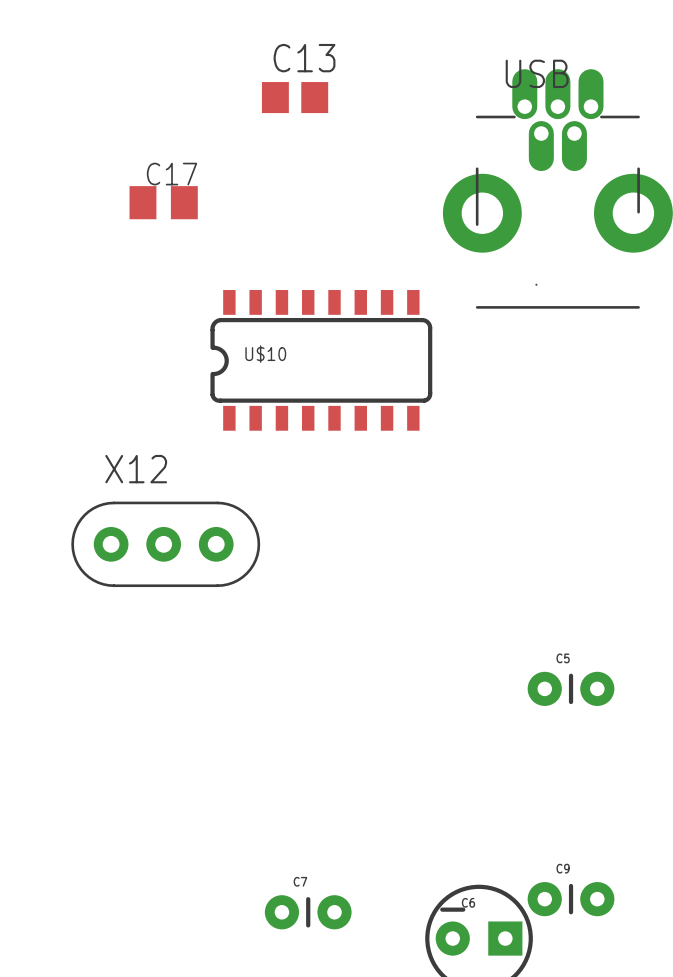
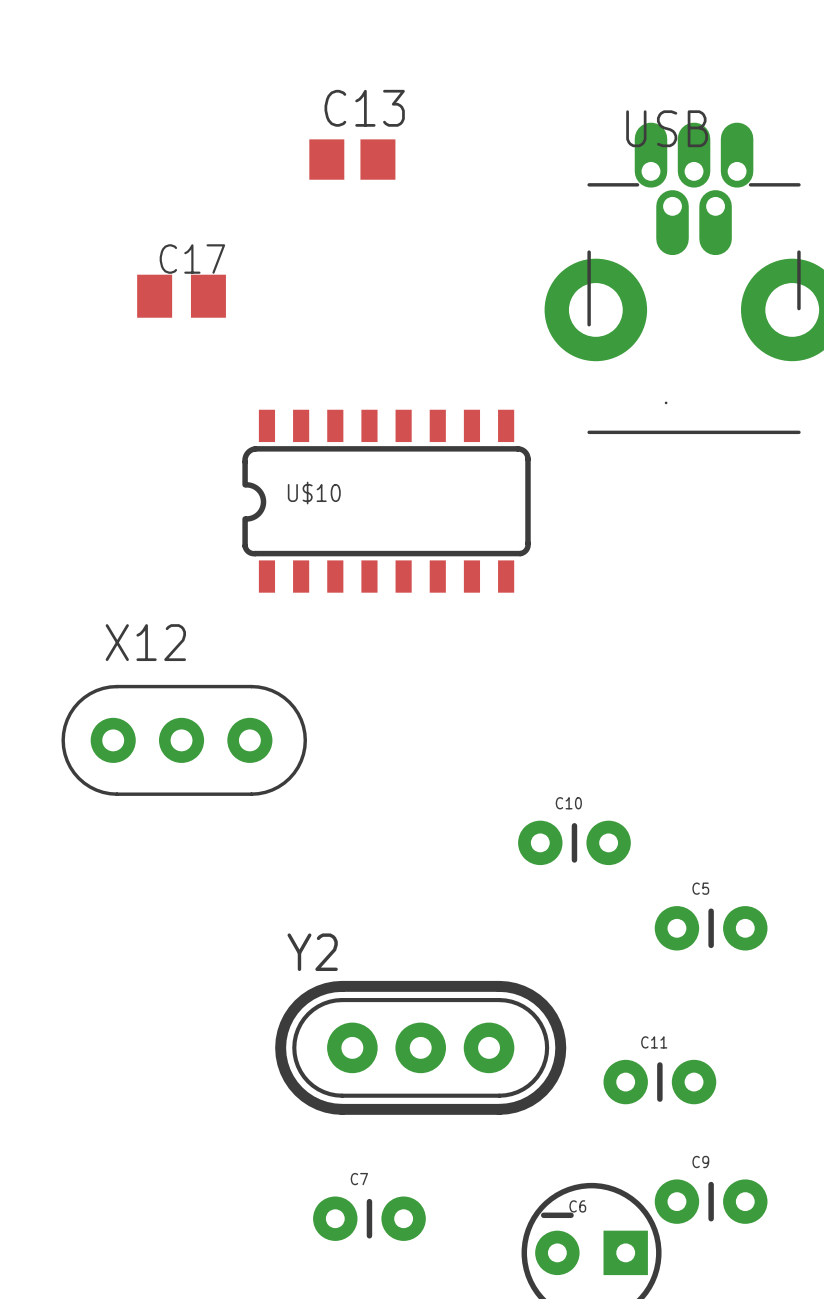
C10: none -> (574, 842)
Y2: none -> (420, 1047)
C11: none -> (659, 1082)

